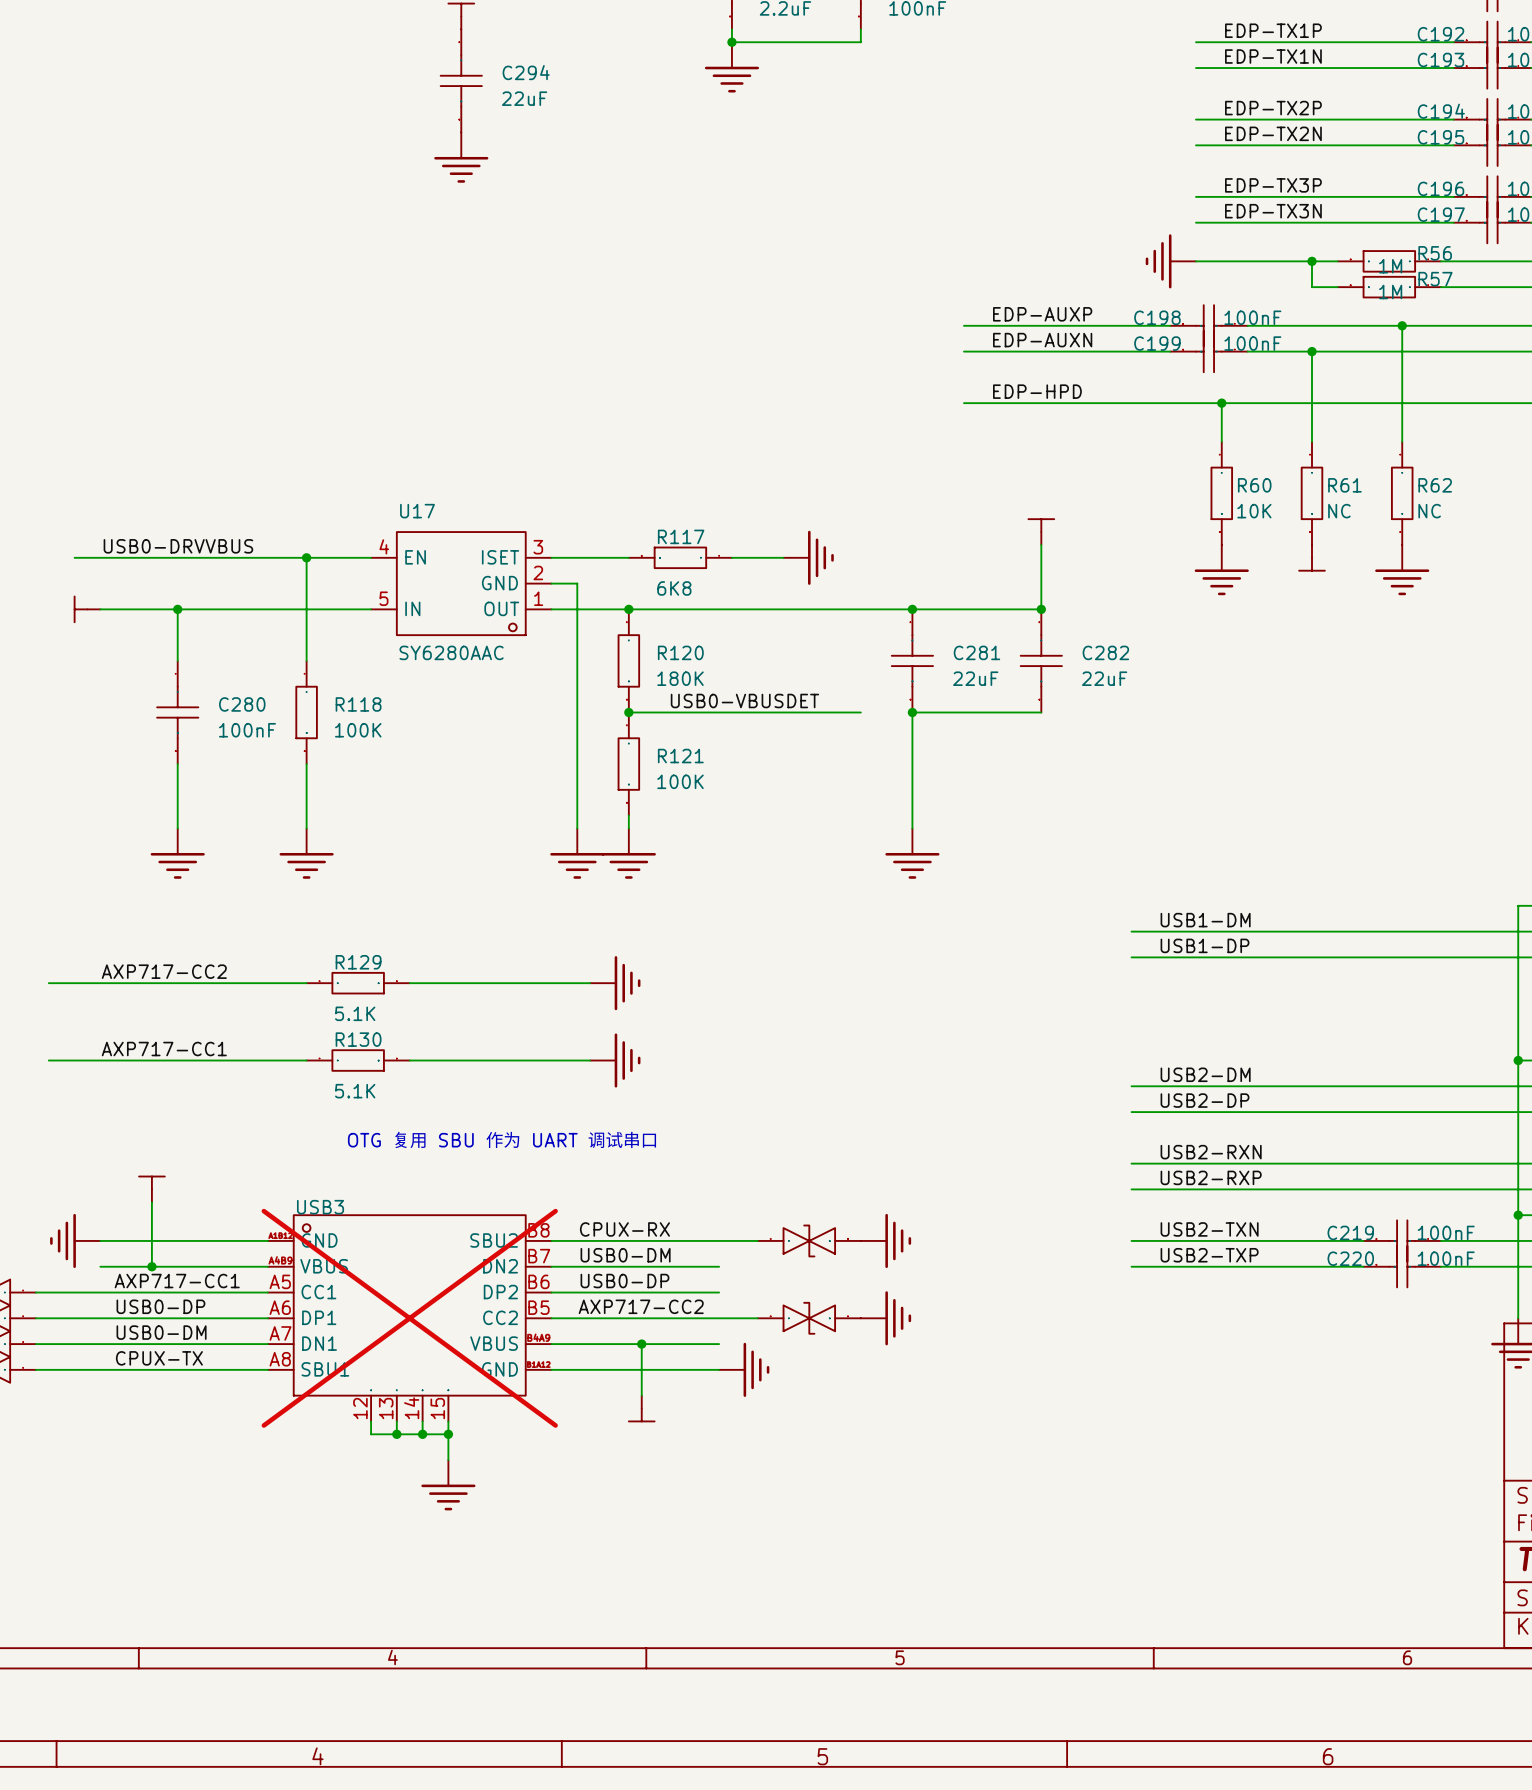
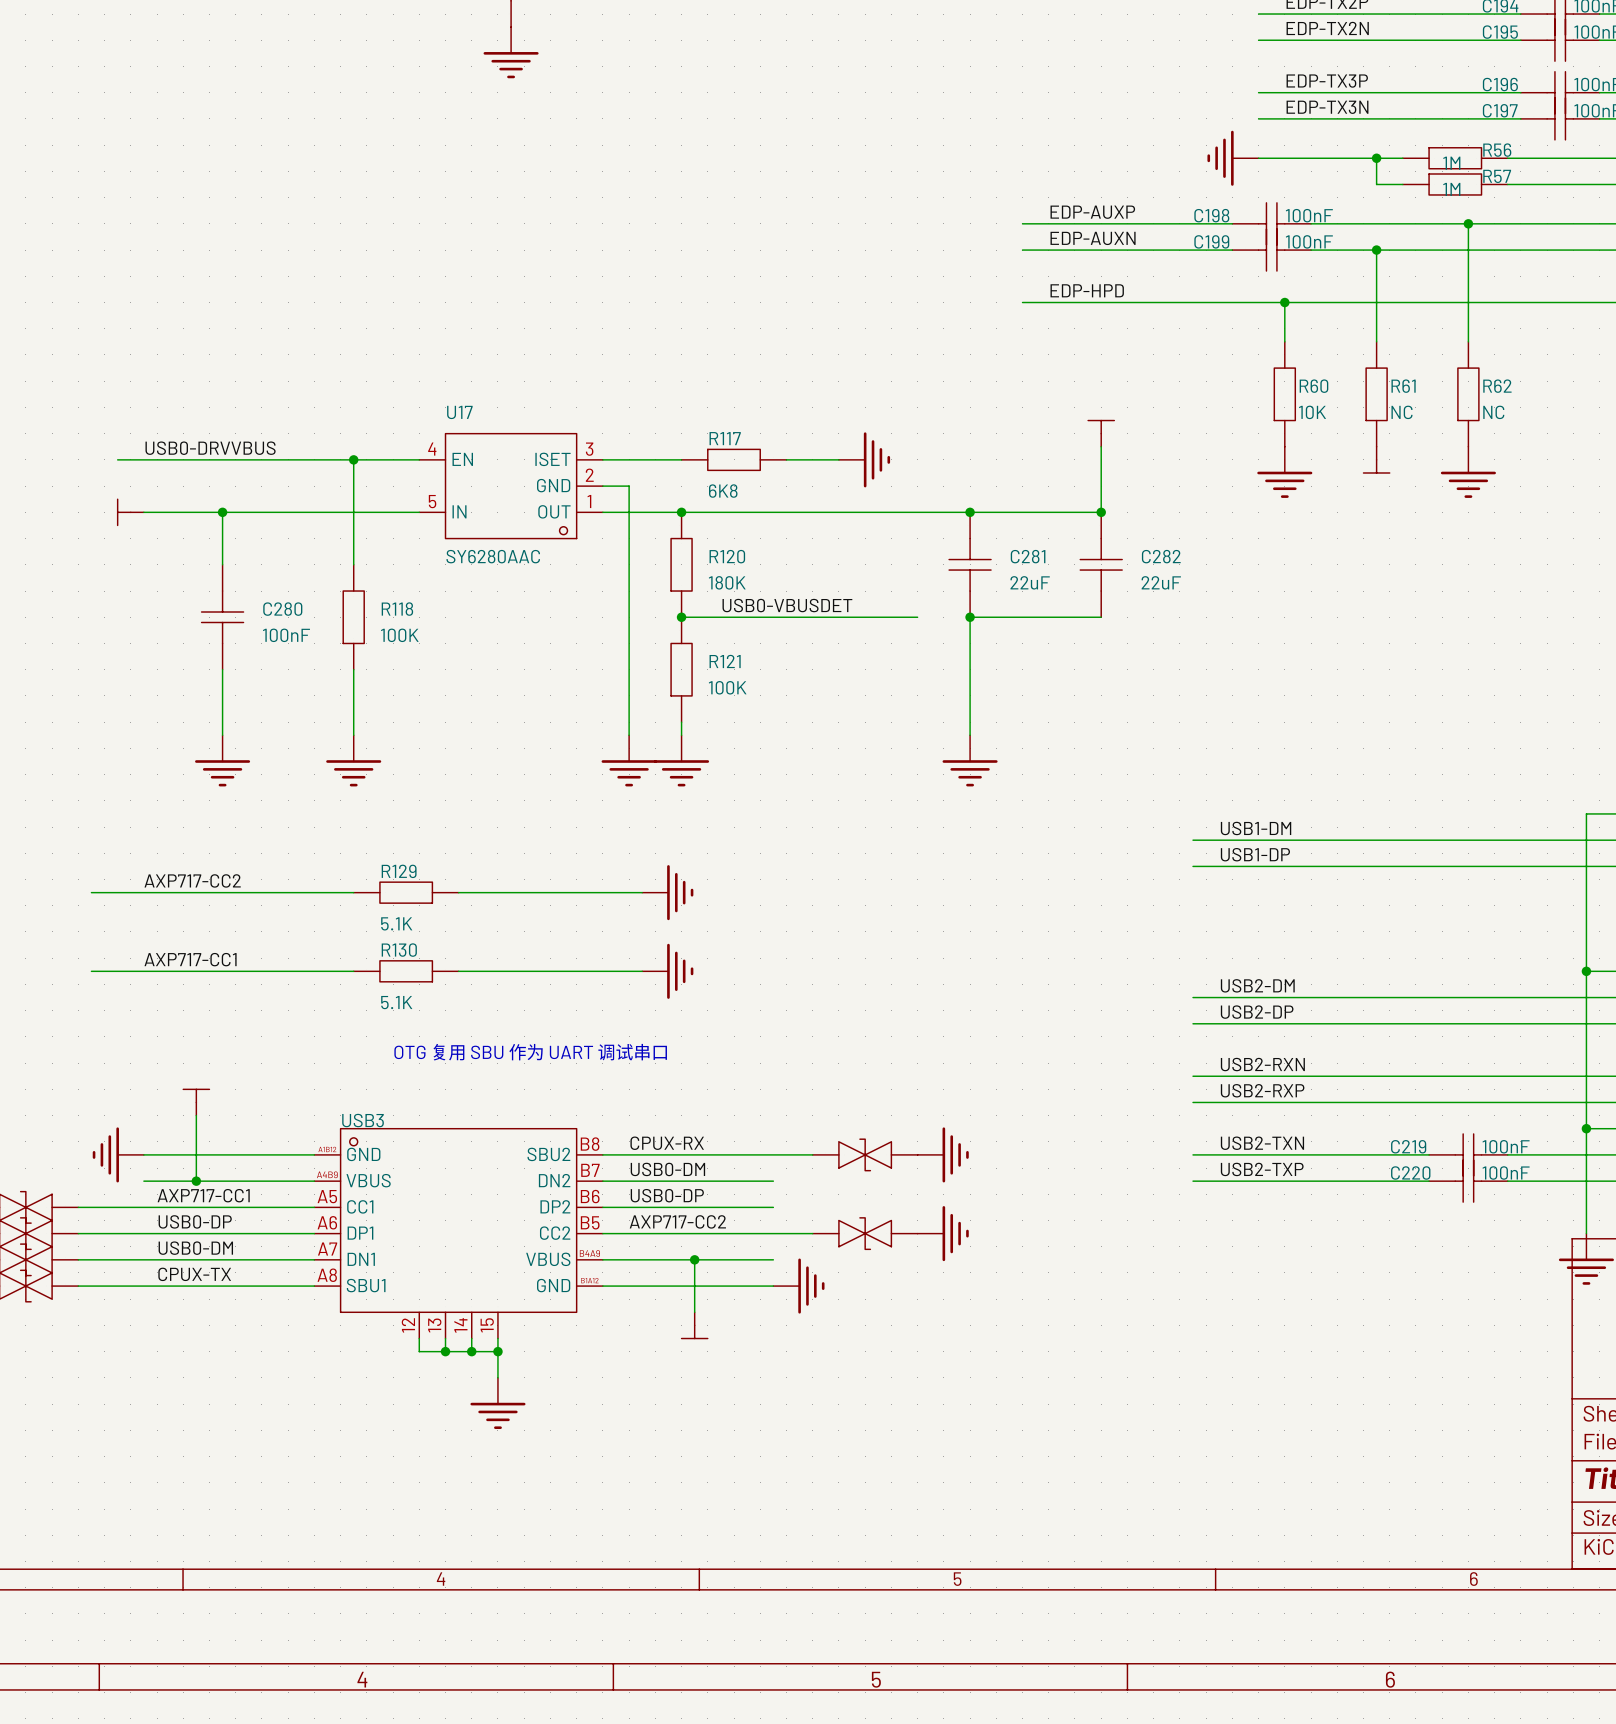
USB3 do-not-place cross: (409, 1318) -> none

